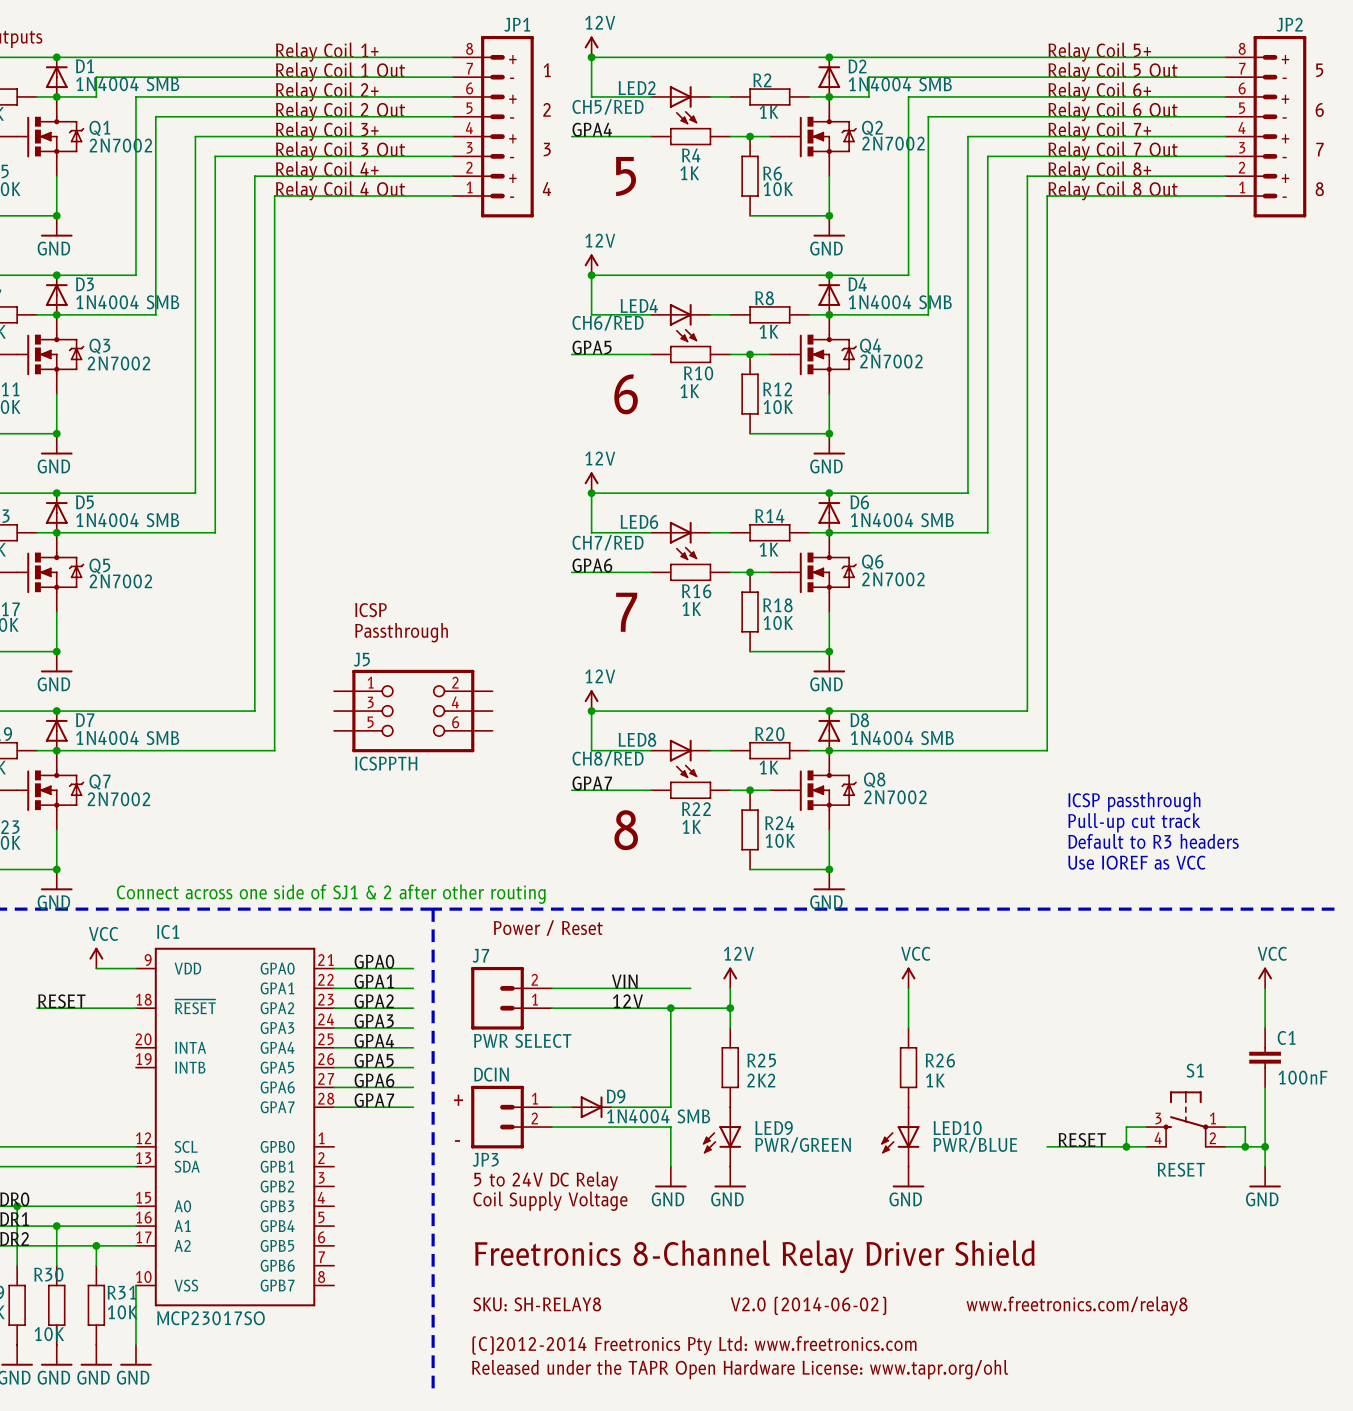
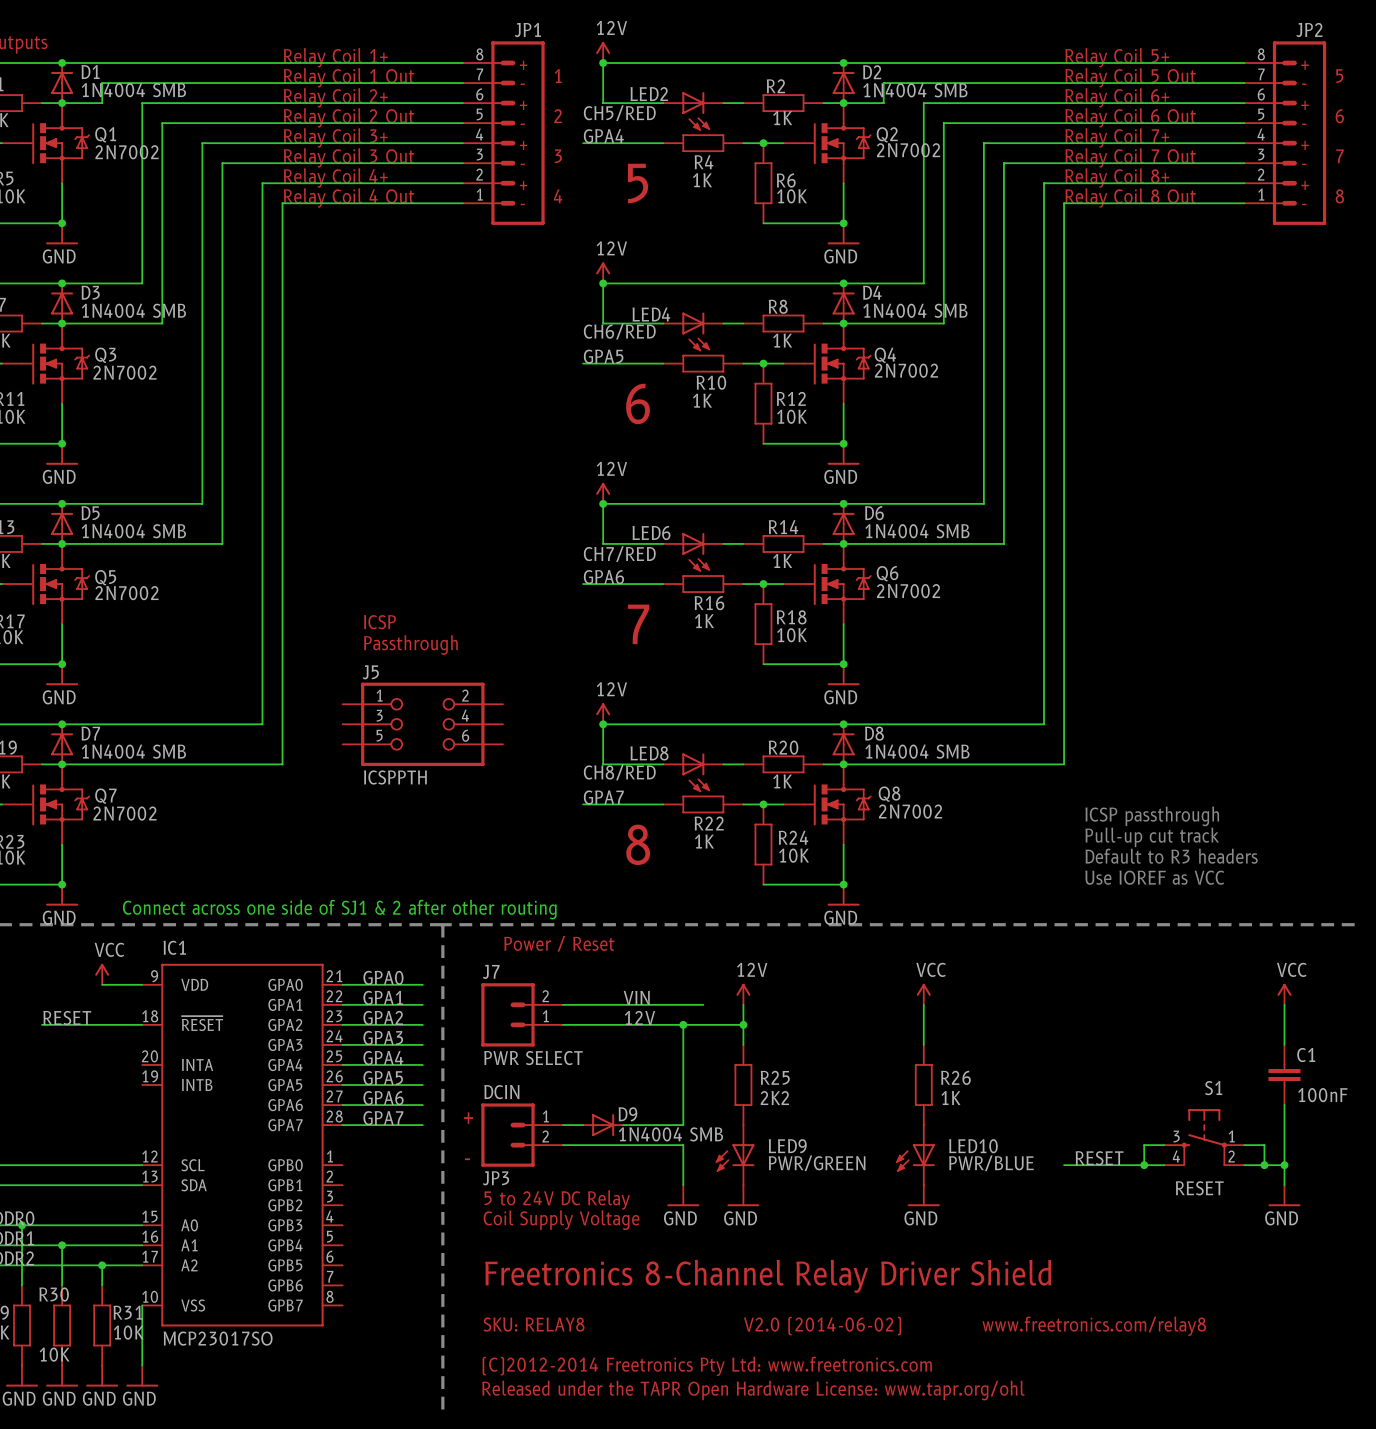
text: SKU: SH-RELAY8 (537, 1304) -> SKU: RELAY8 (534, 1324)

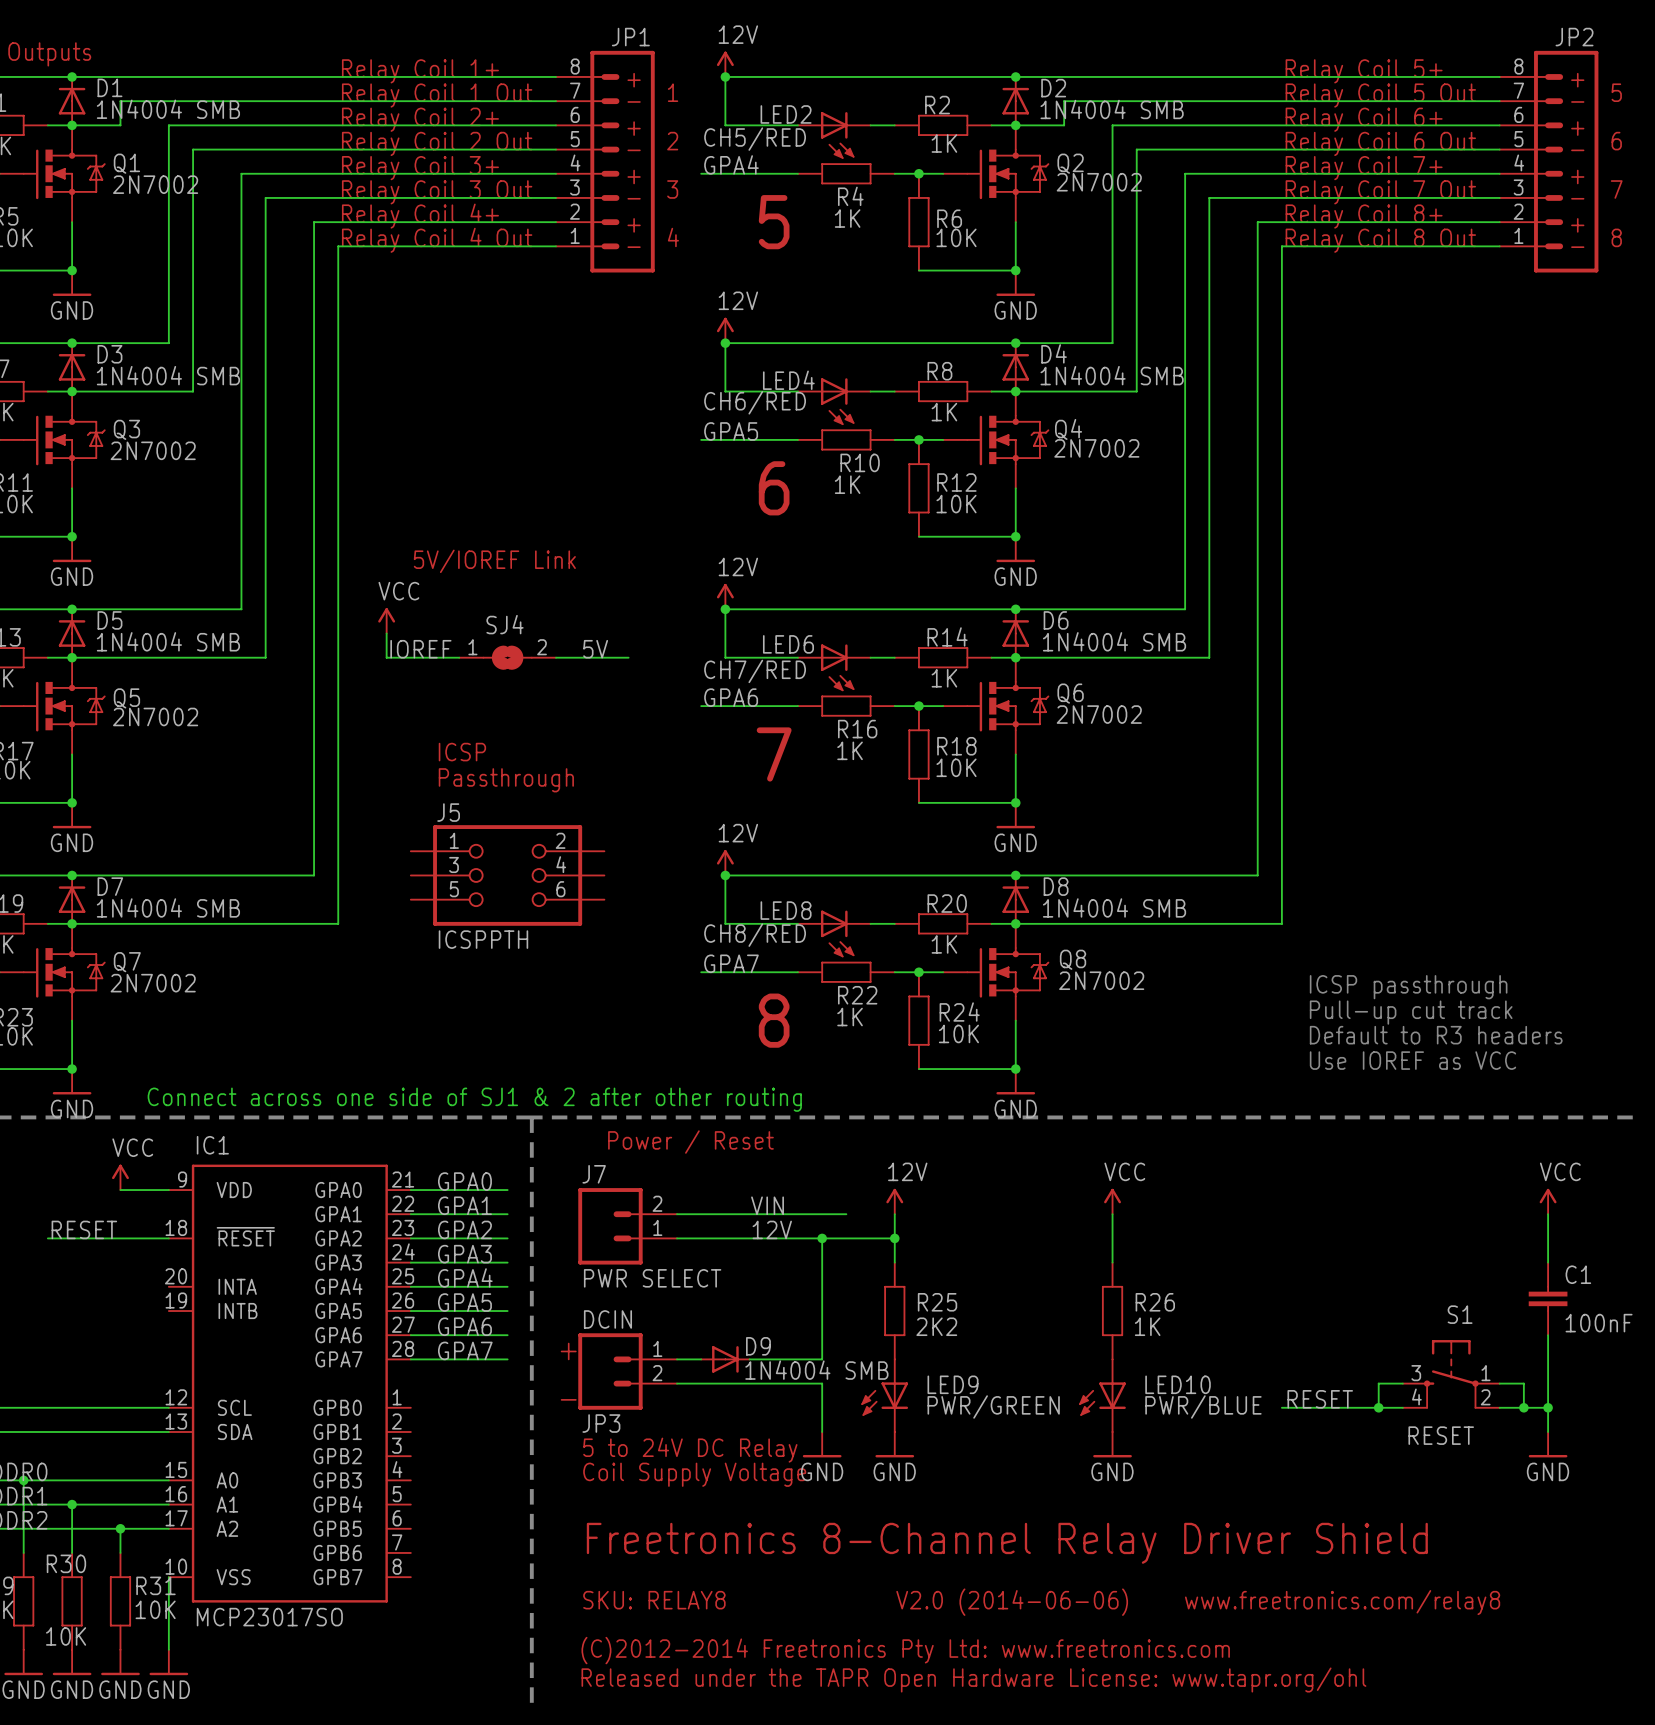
text: none -> 5V/IOREF Link (494, 561)
power symbol: none -> VCC (386, 620)
wire: none -> (386, 633) (386, 657) (459, 657)
label: none -> IOREF (420, 649)
label: none -> 5V (595, 649)
SJ4: none -> (507, 657)
wire: none -> (556, 657) (628, 657)
text: V2.0 (2014-06-02) (822, 1326) -> V2.0 (2014-06-06) (1012, 1602)

